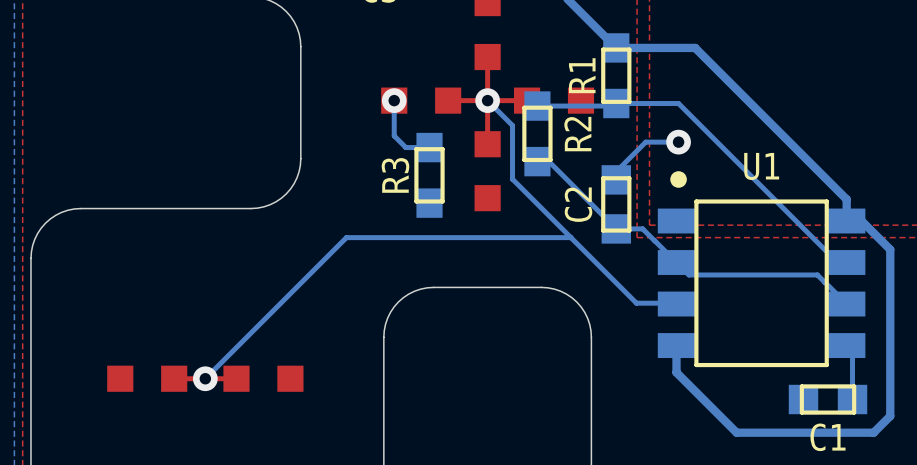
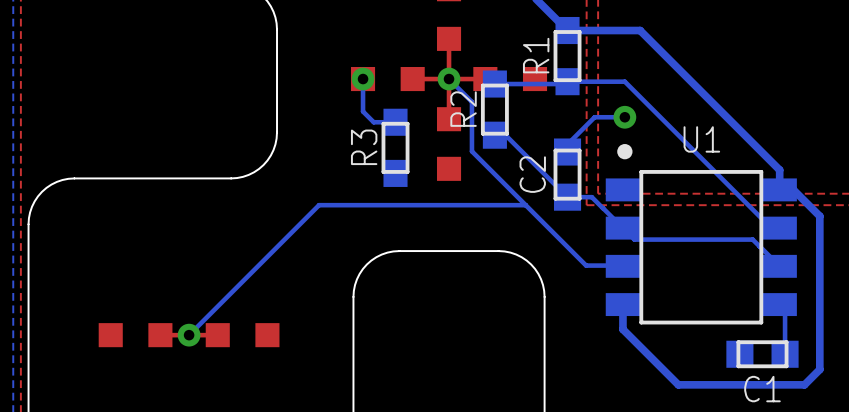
R2 name position: R2 (577, 134) -> R2 (463, 109)

